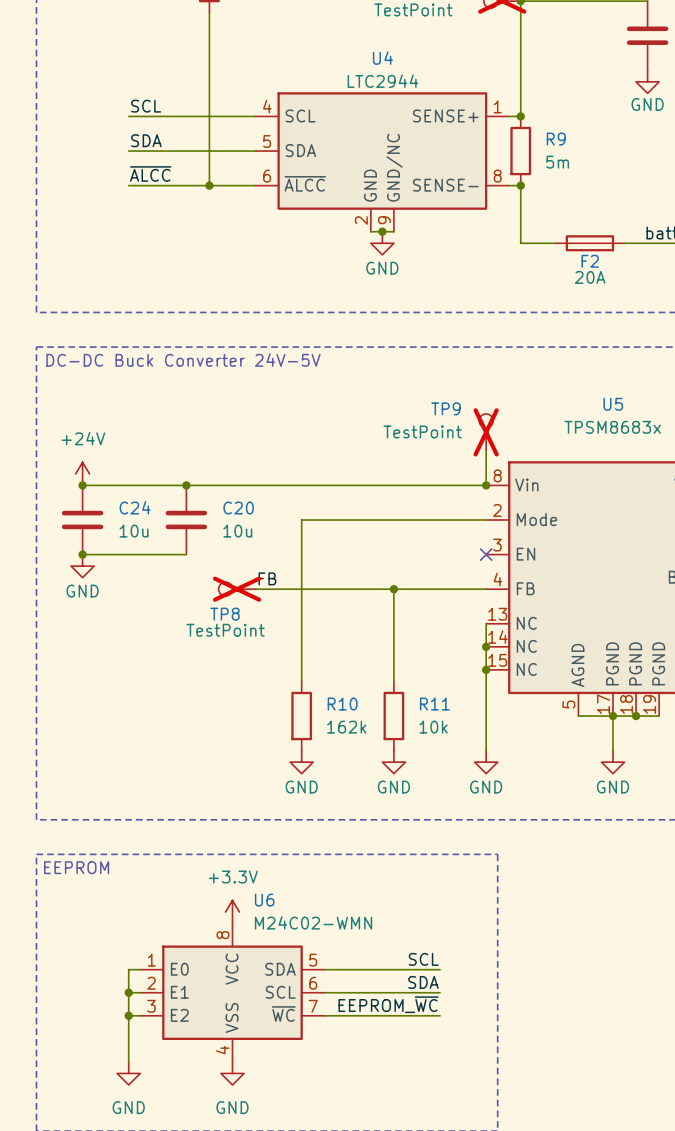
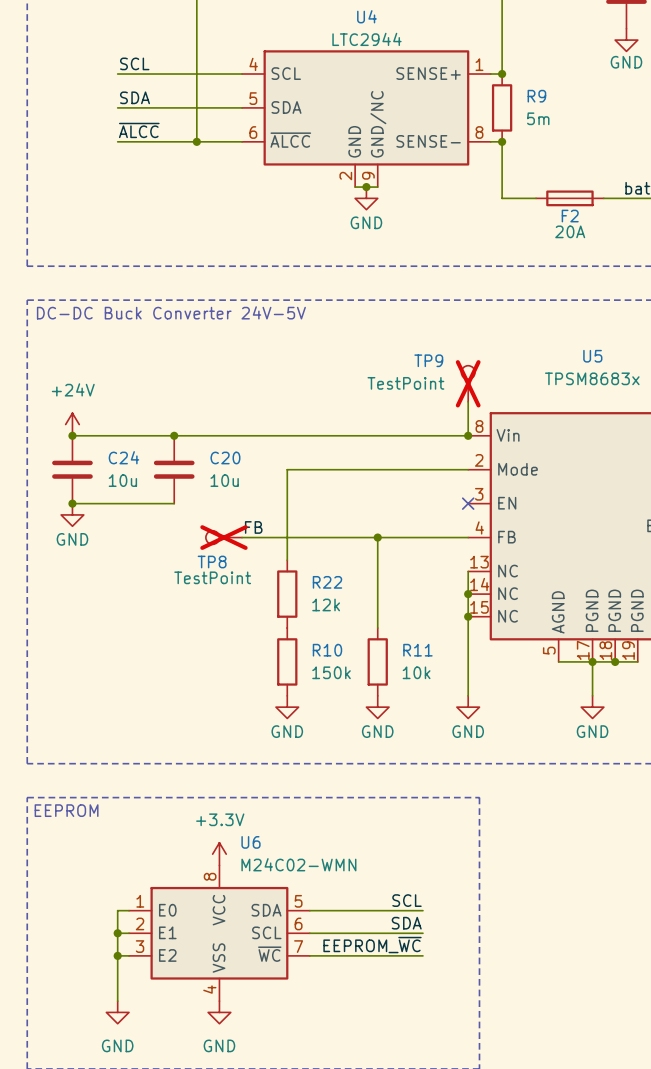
wire: (301, 612) (301, 681) -> none
R22: none -> 12k (287, 594)
R10 value: 162k (346, 727) -> 150k (331, 672)

